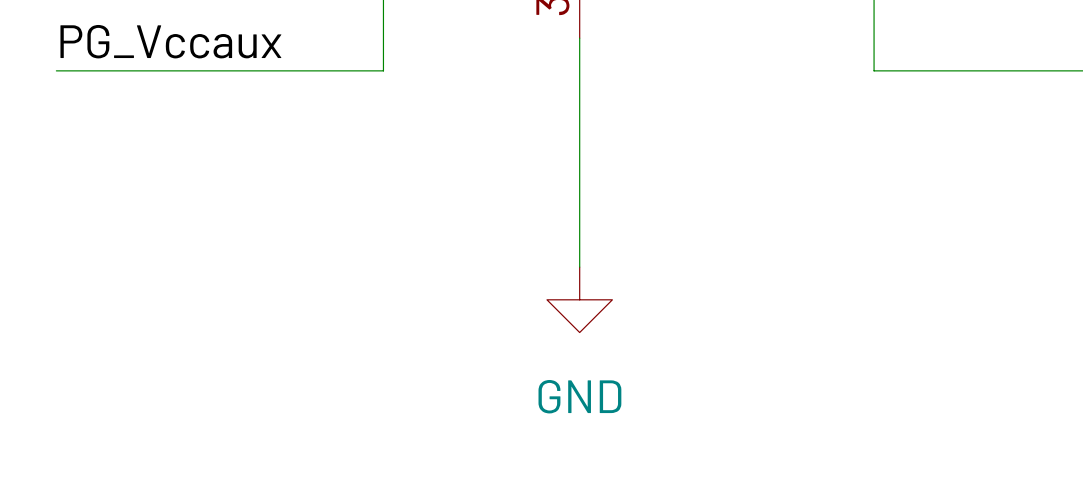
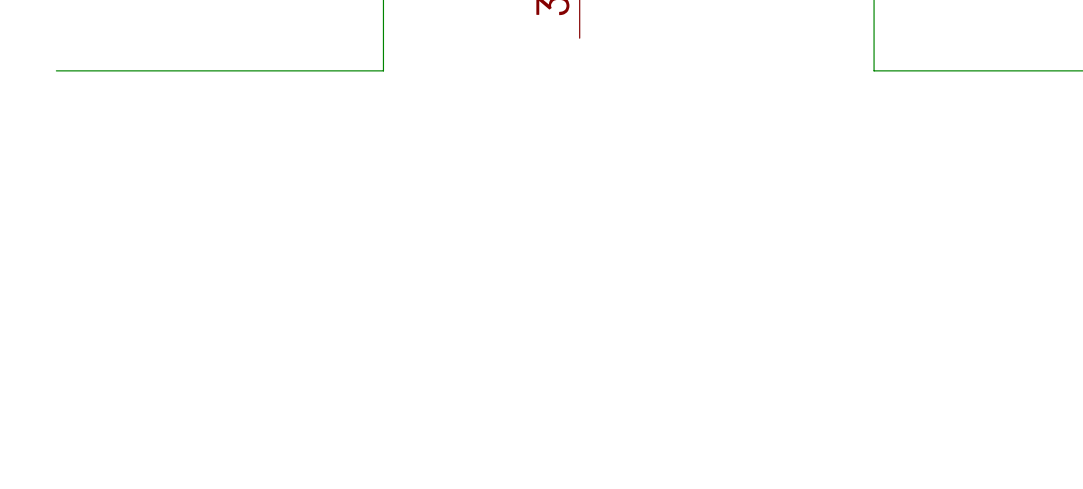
wire: (579, 38) (579, 267) -> none
label: PG_Vccaux (170, 41) -> none
power symbol: GND (579, 299) -> none

